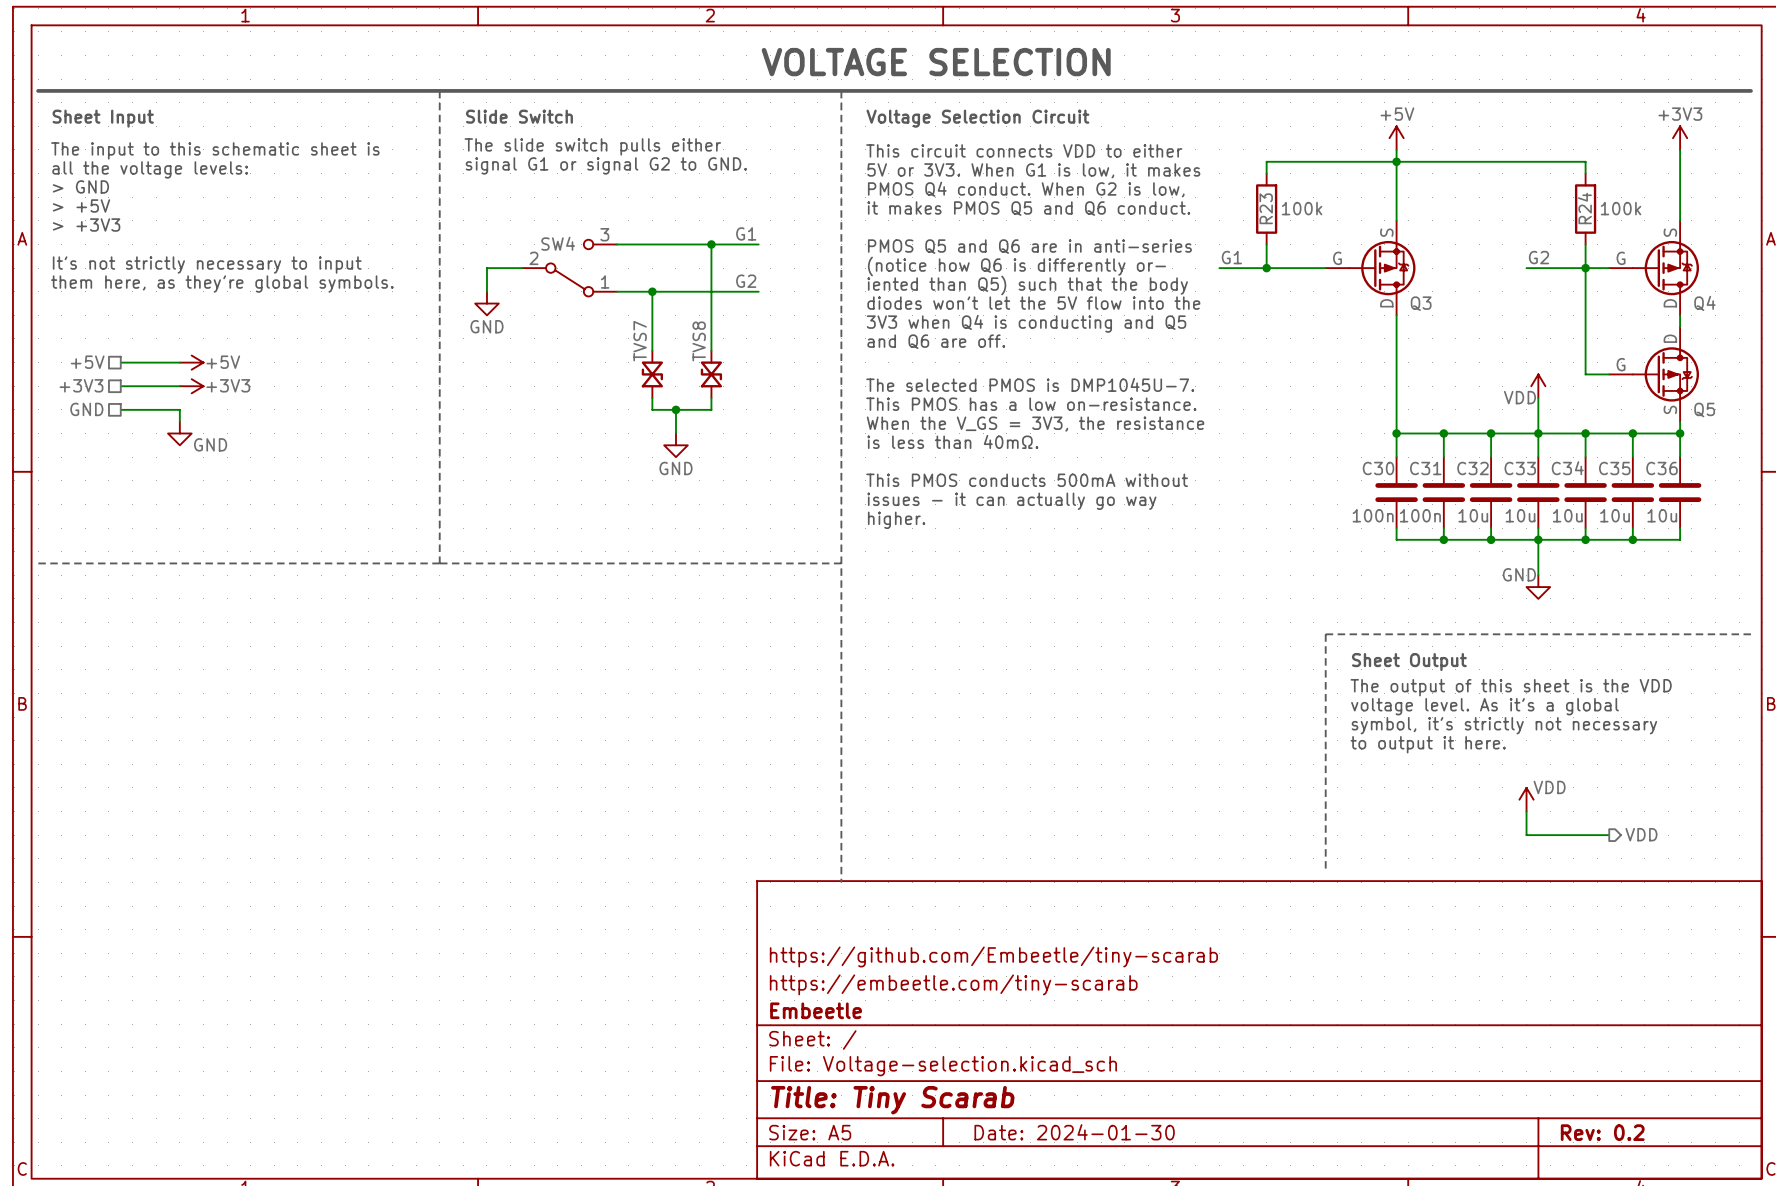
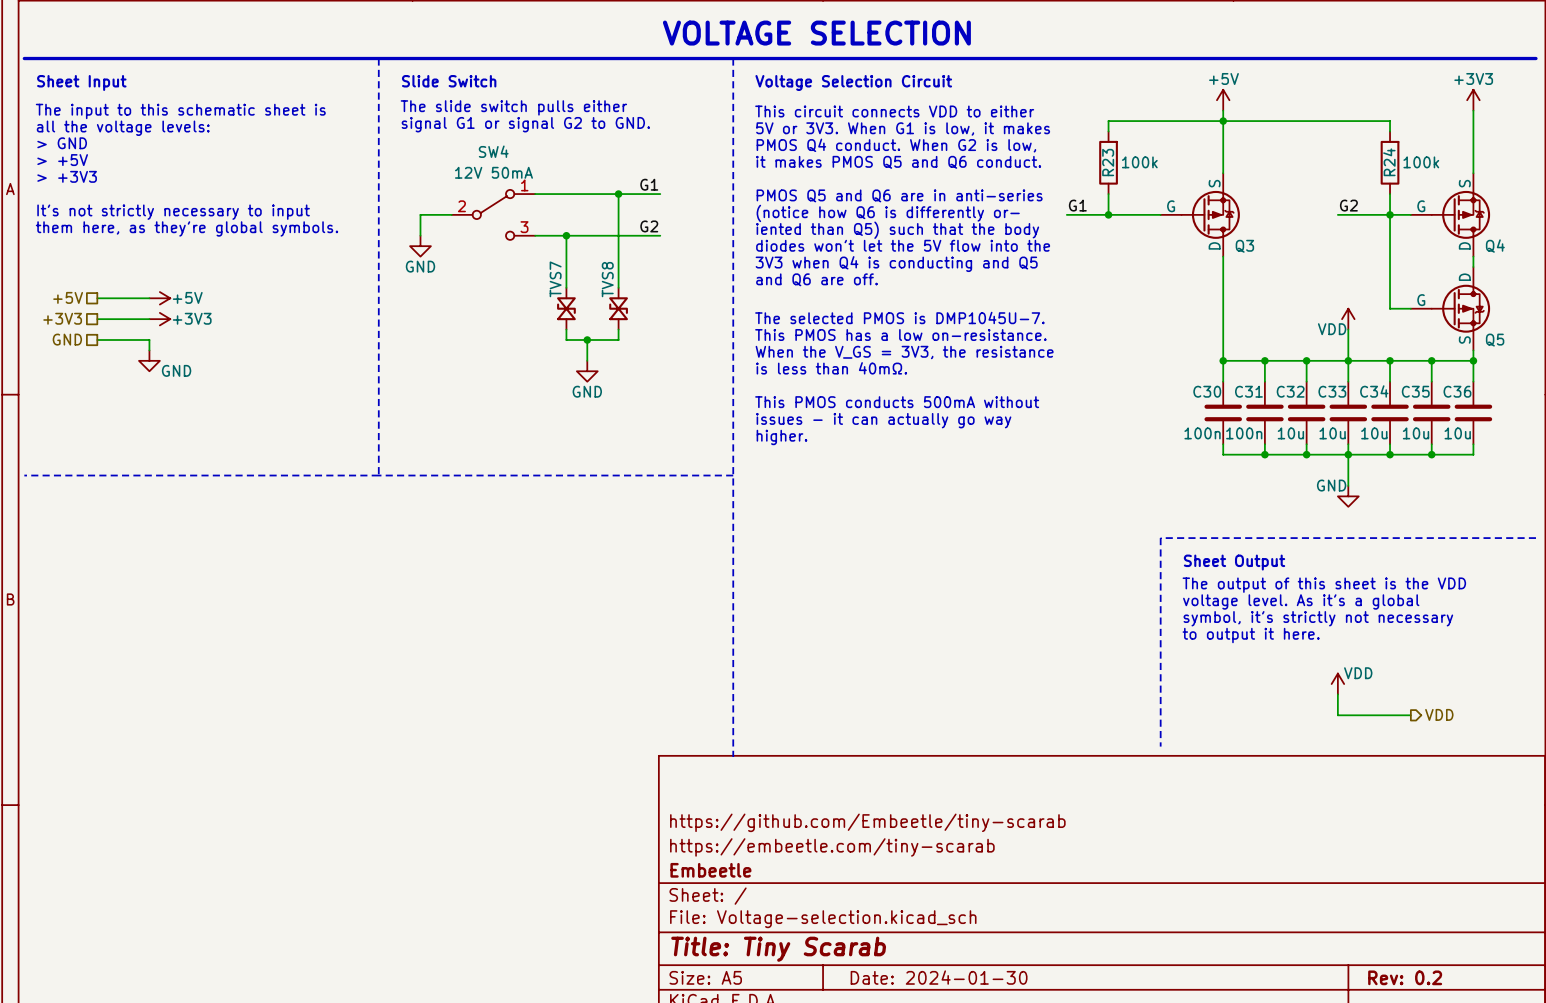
SW4 value: none -> 12V 50mA (493, 172)
SW4 name position: SW4 (558, 243) -> SW4 (493, 151)
SW4 flip: as is (569, 268) -> up-down (493, 214)

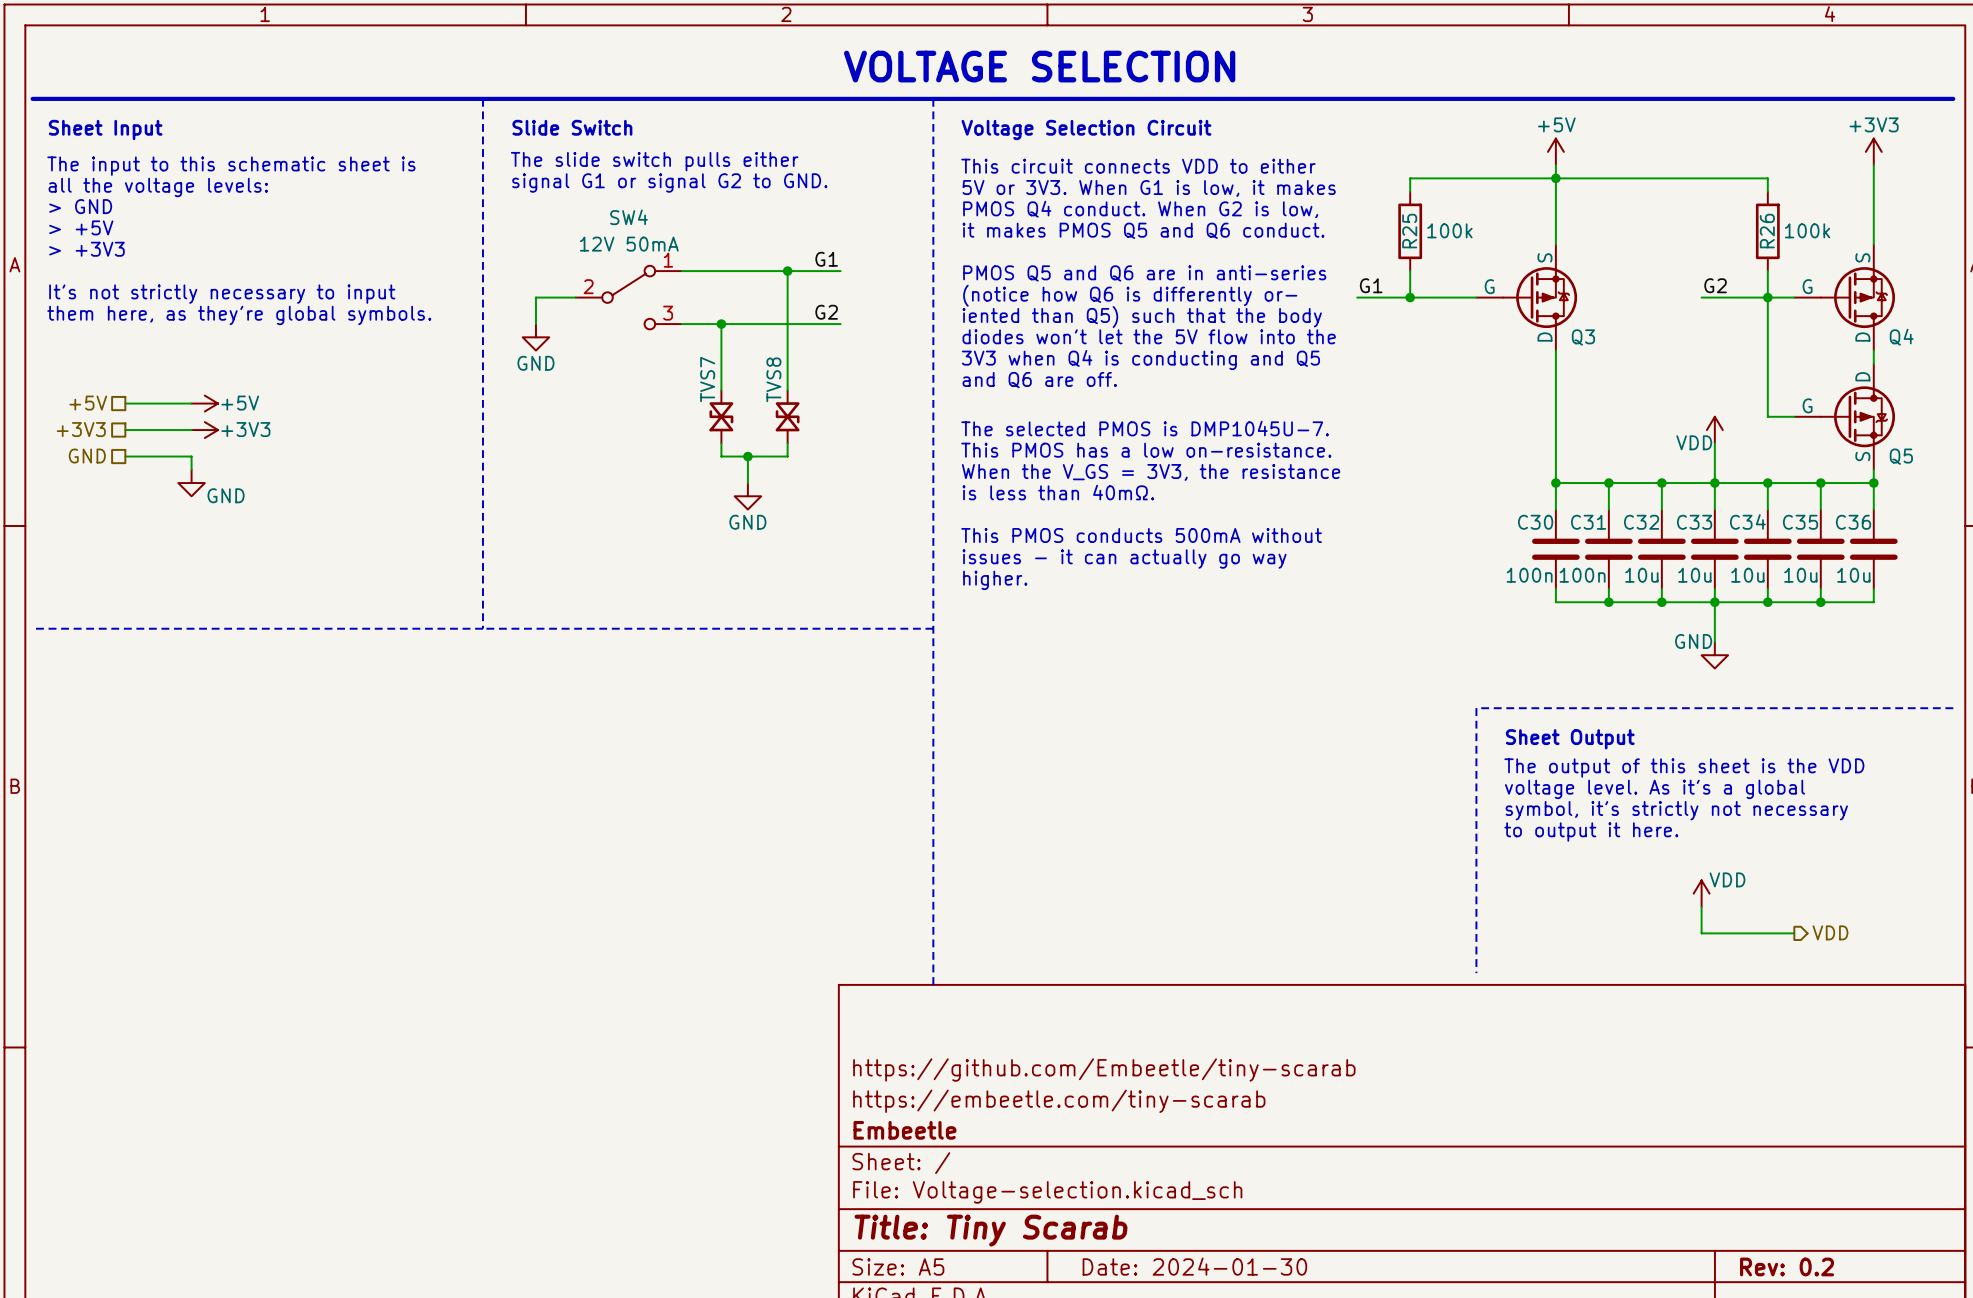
R23 name: R23 (1108, 162) -> R25 (1409, 231)
R24 name: R24 (1389, 162) -> R26 (1767, 231)

